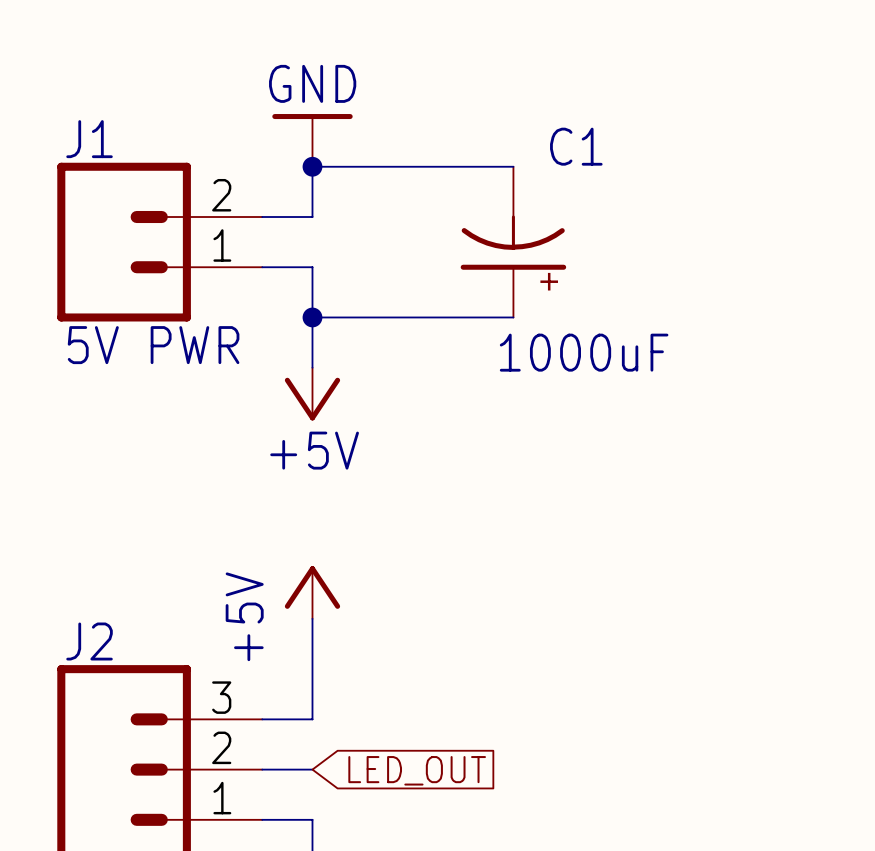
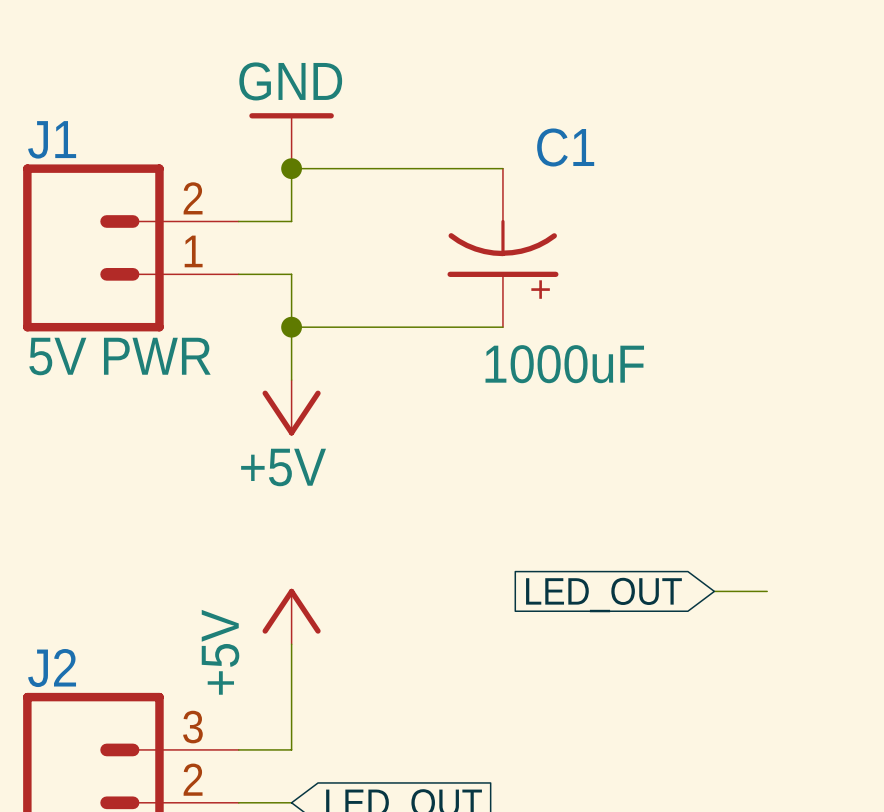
wire: none -> (714, 591) (767, 591)
global label: none -> LED_OUT (603, 595)

